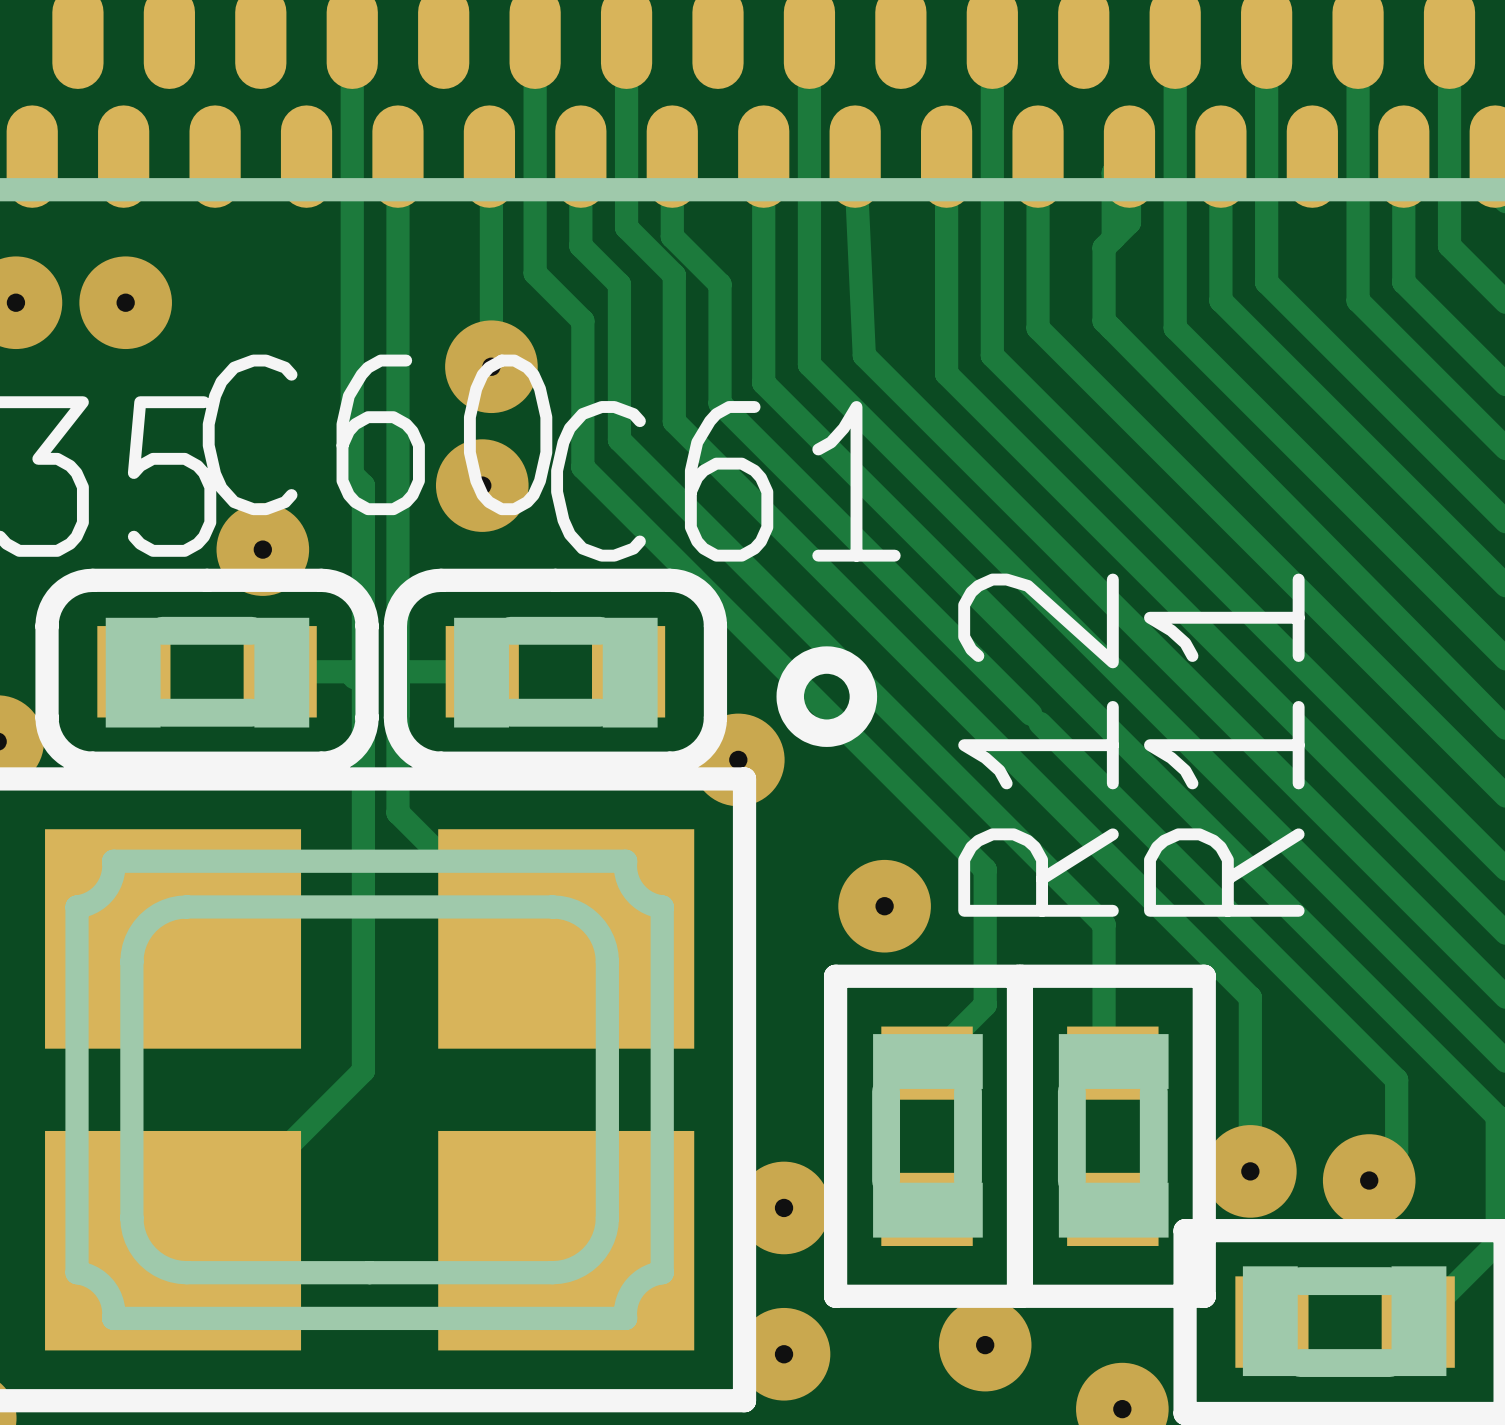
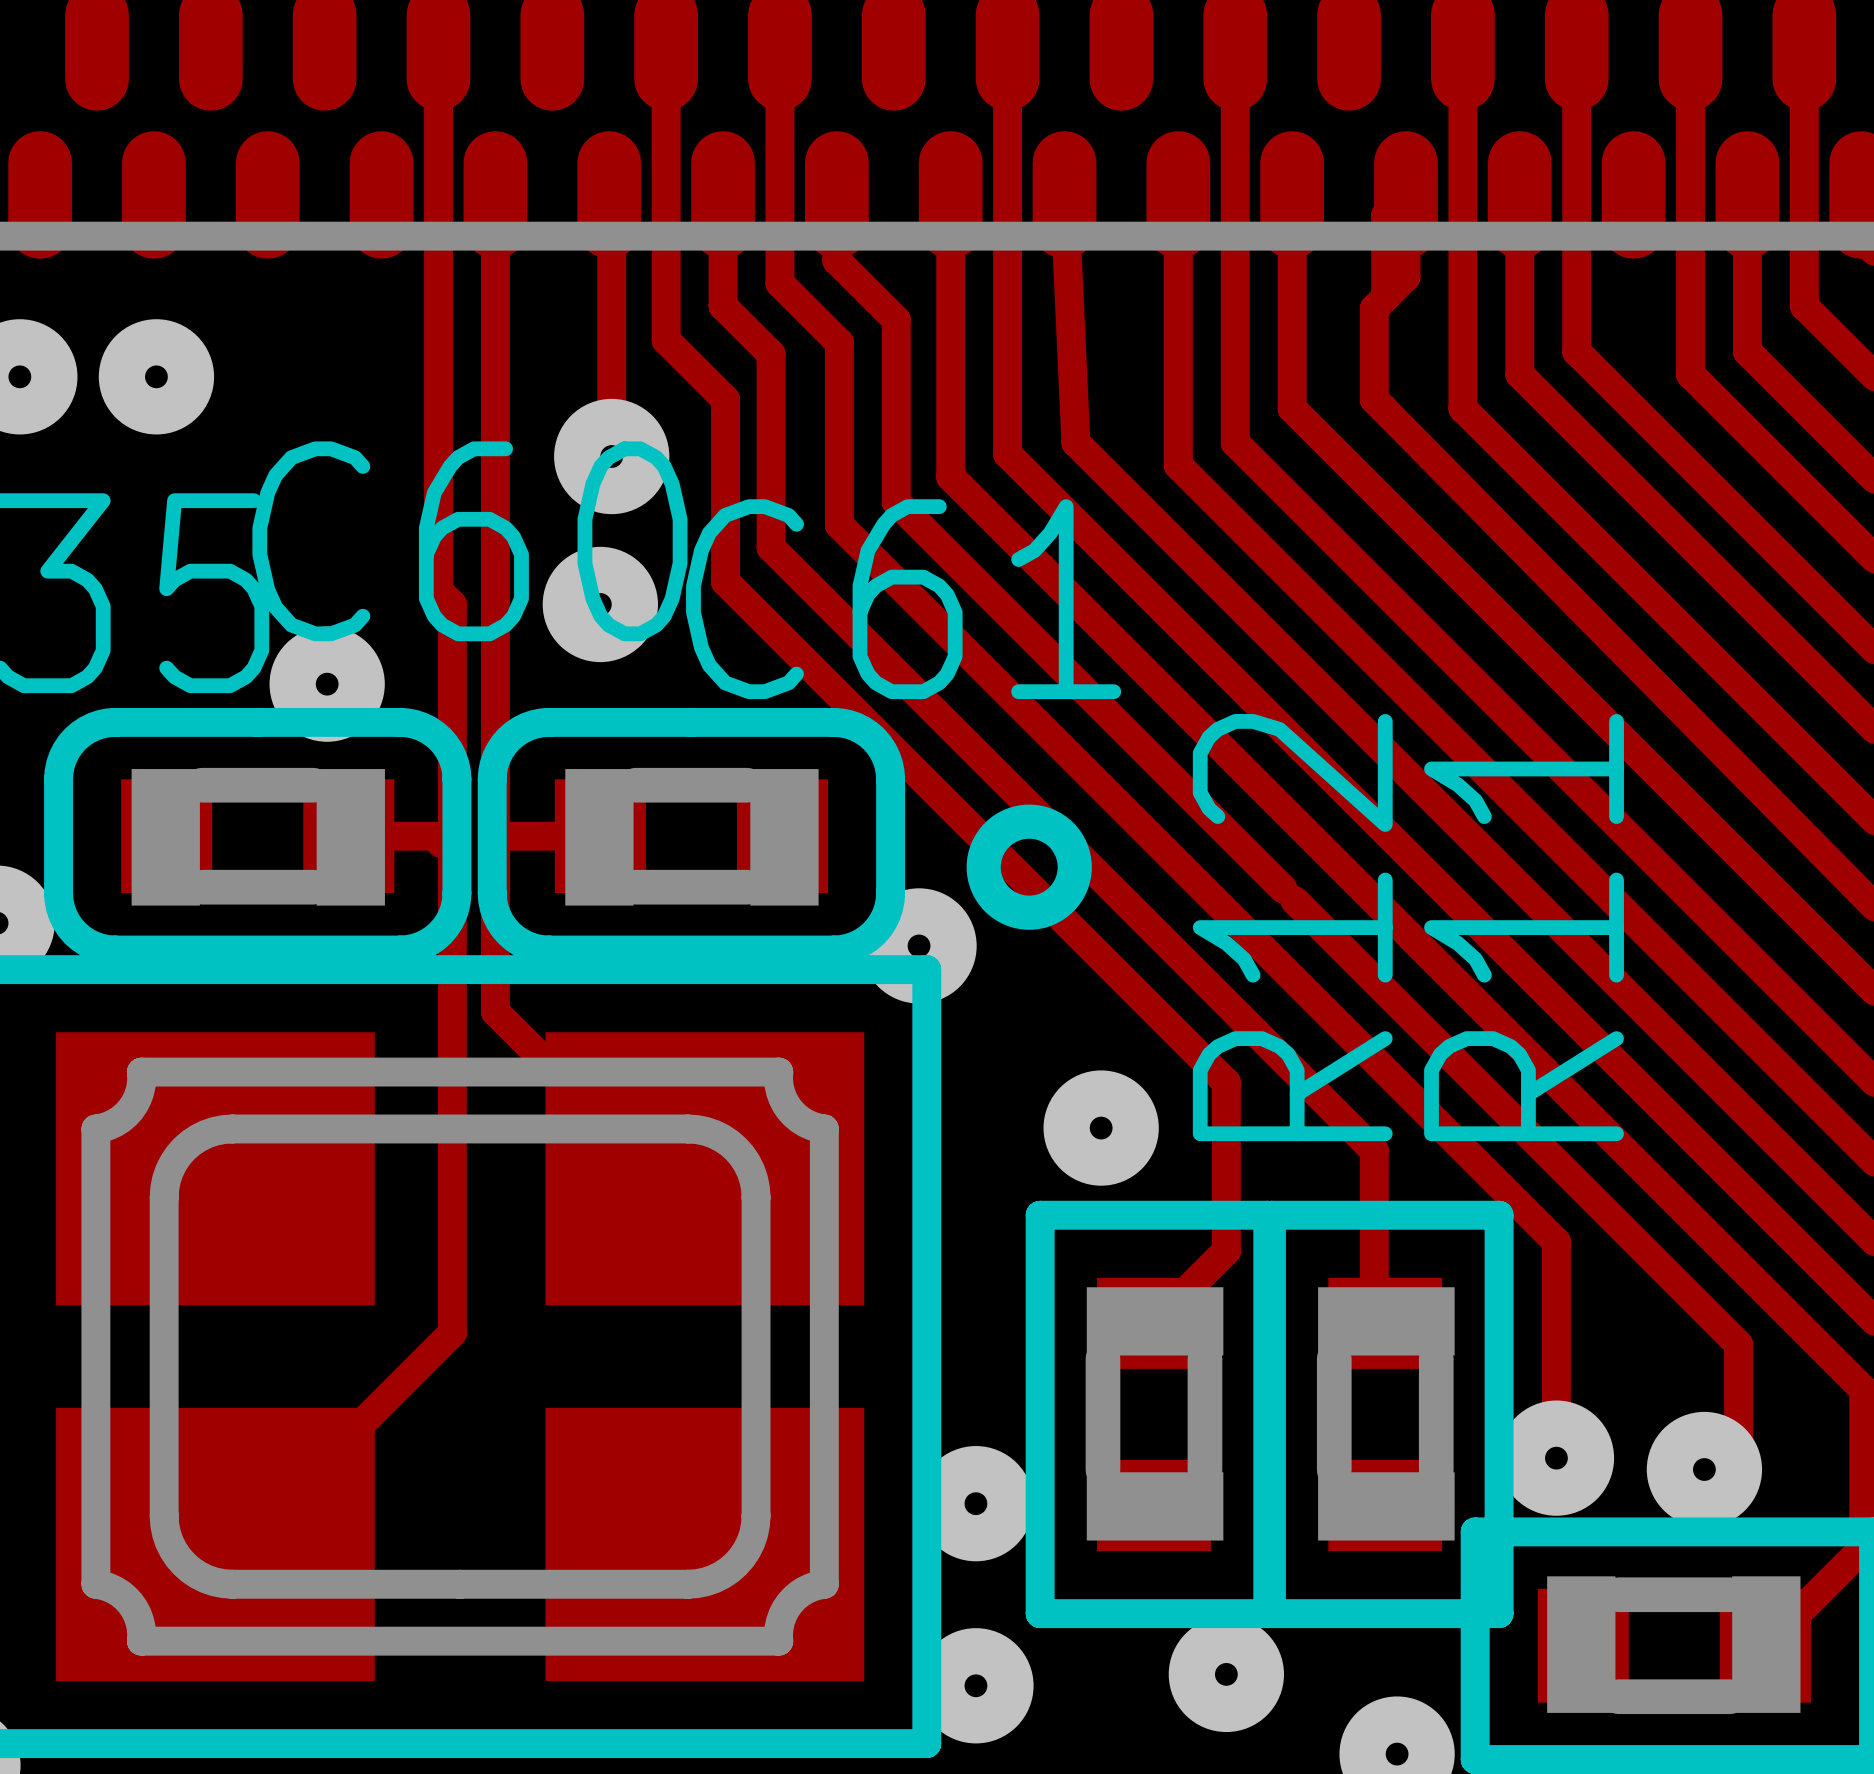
track: (672, 209) (672, 236) (720, 284) -> (836, 260) (896, 319) (896, 354)

